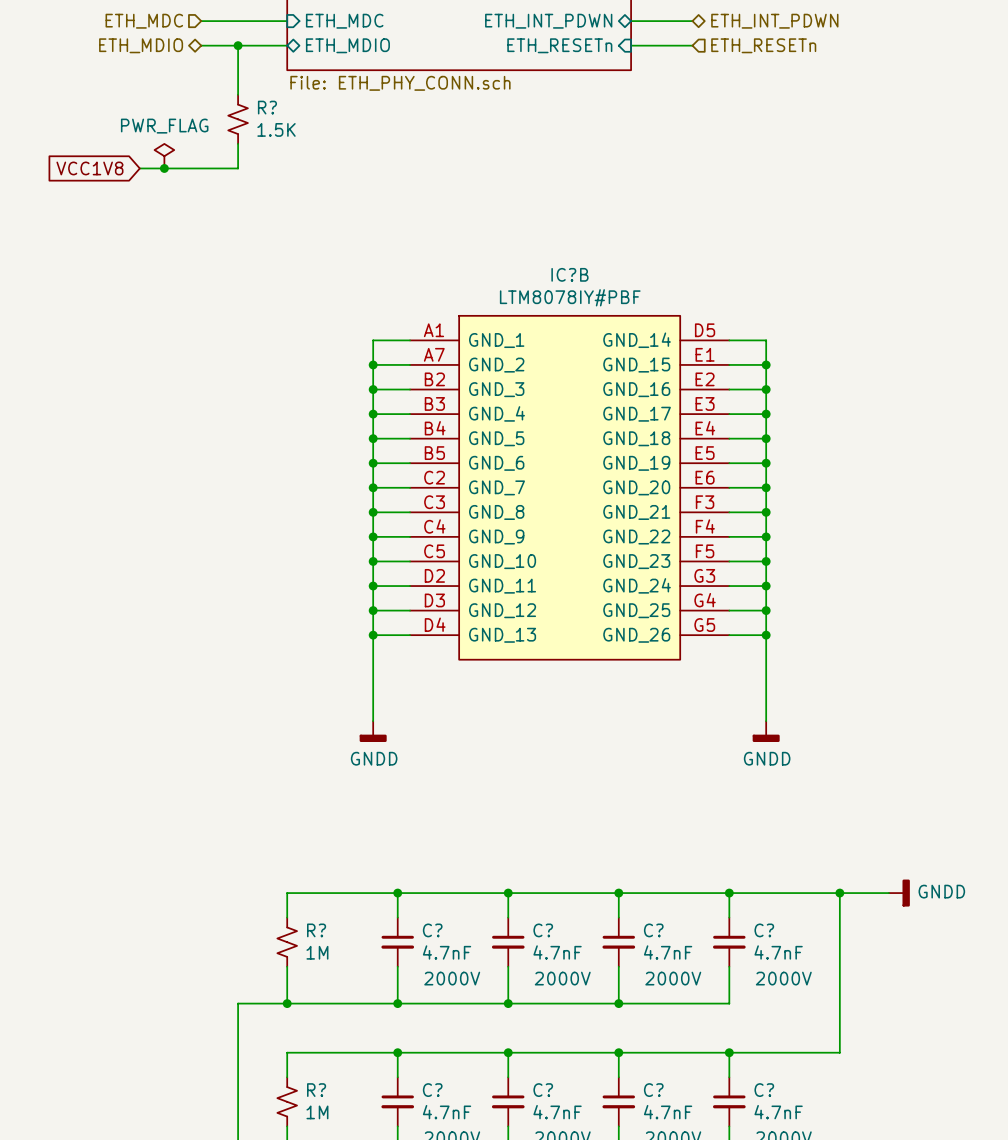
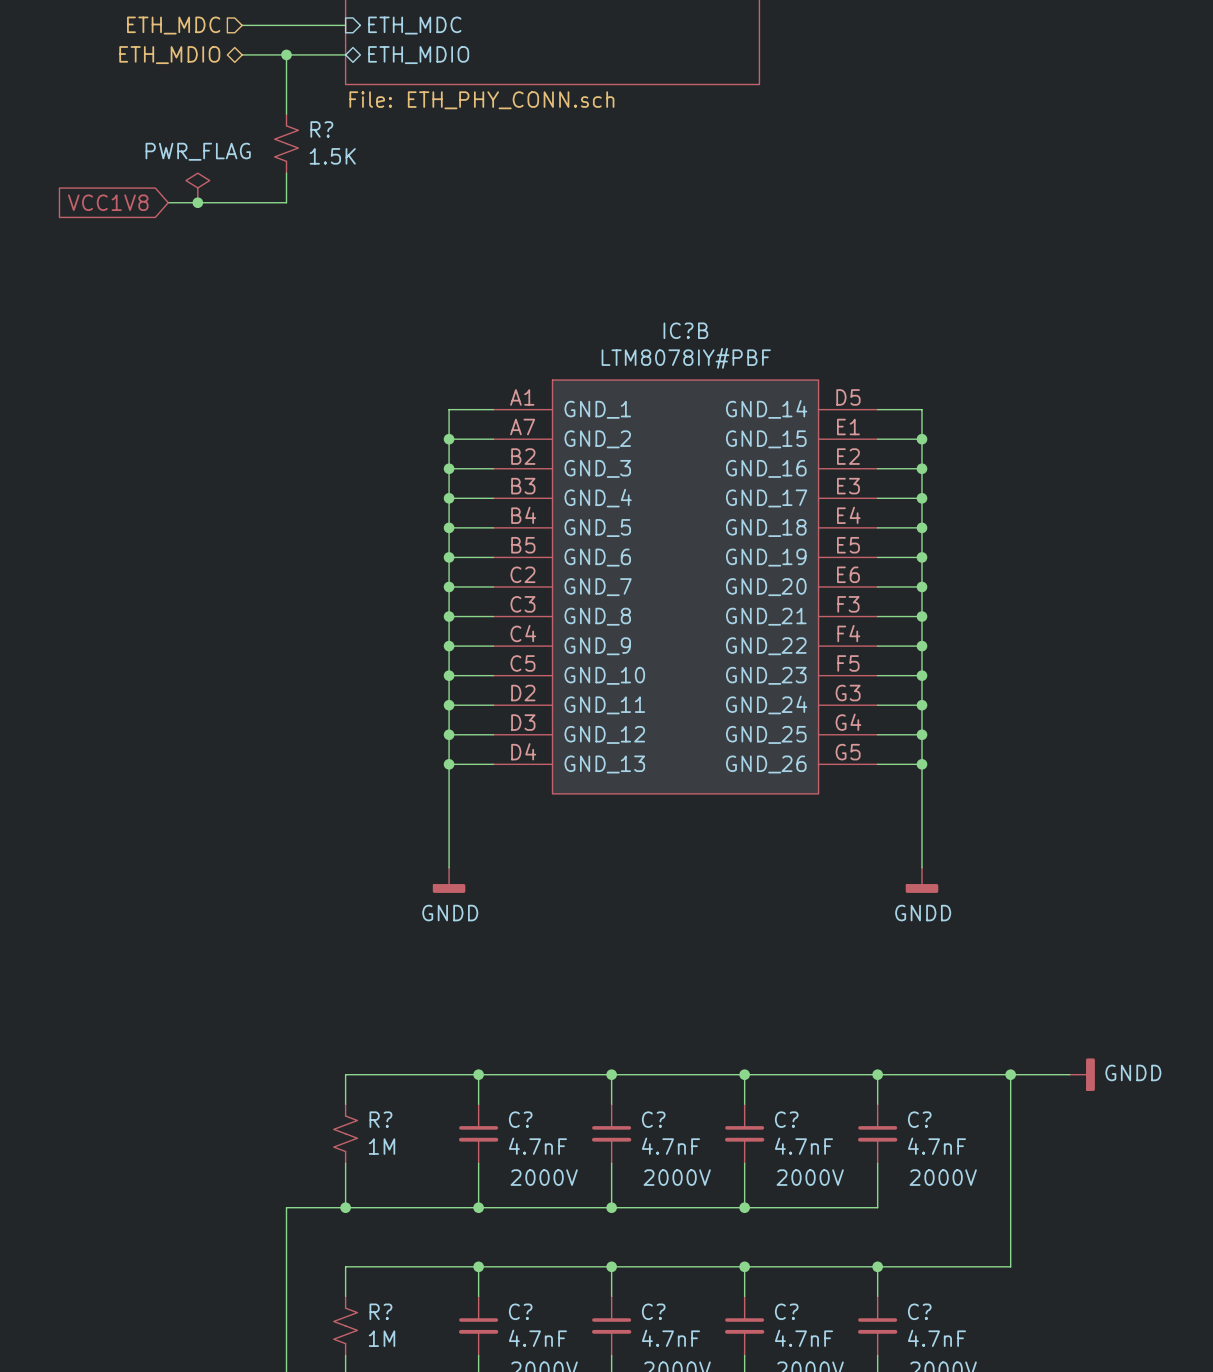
sheet pin: ETH_INT_PDWN (548, 21) -> none
wire: (631, 21) (692, 21) -> none
hierarchical label: ETH_INT_PDWN (774, 21) -> none
sheet pin: ETH_RESETn (559, 45) -> none
wire: (631, 45) (692, 45) -> none
hierarchical label: ETH_RESETn (763, 45) -> none

